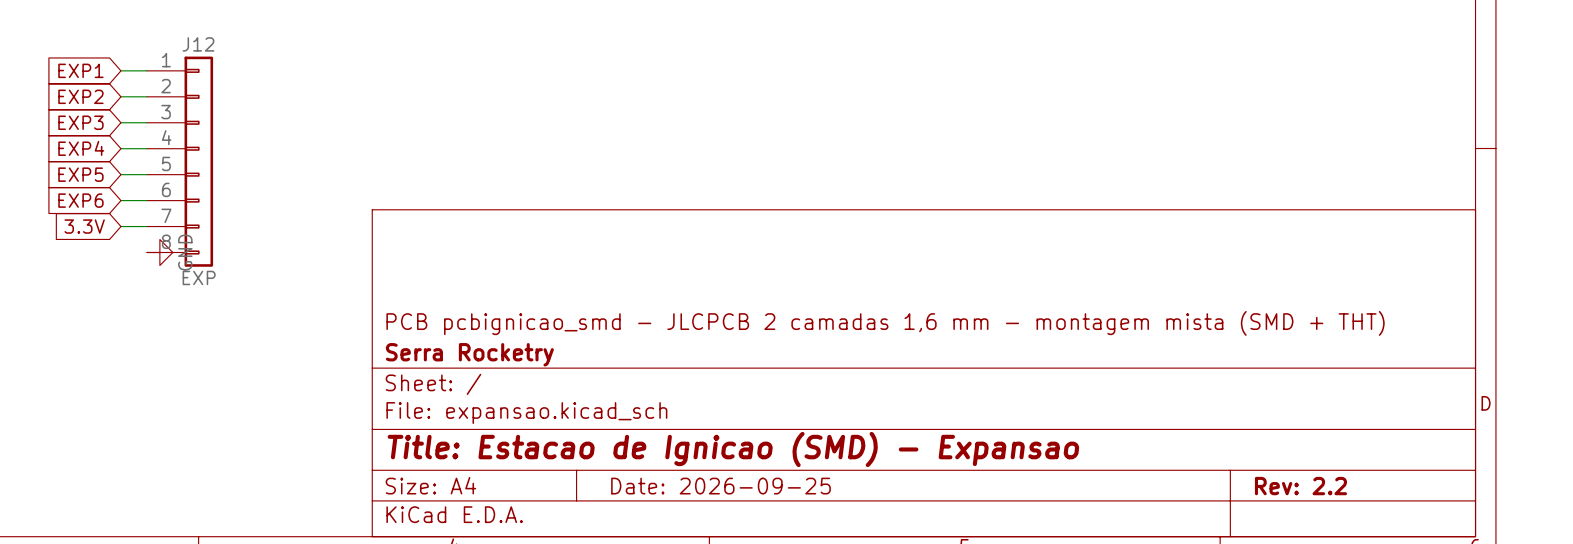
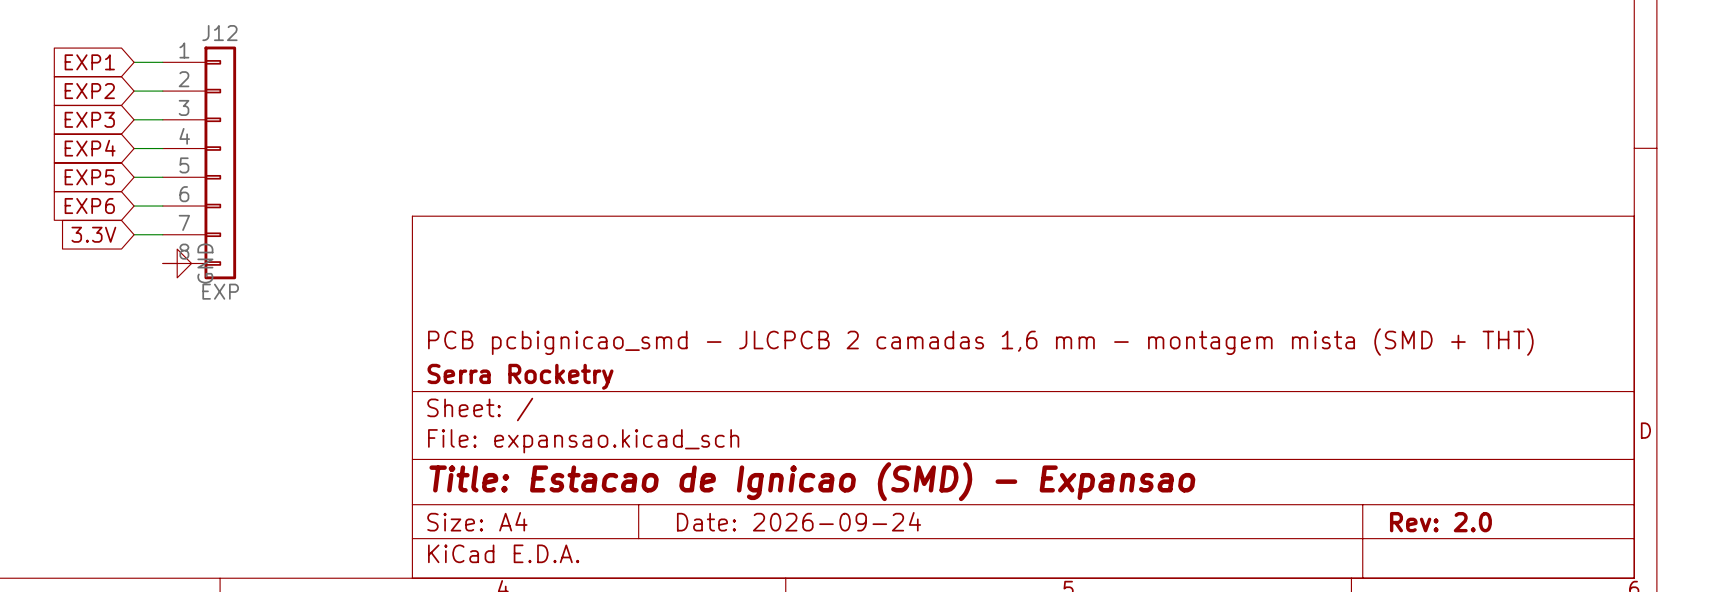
title block: Date: 2026-09-25 (720, 486) -> Date: 2026-09-24 (799, 521)
title block: Rev: 2.2 (1300, 486) -> Rev: 2.0 (1440, 522)

